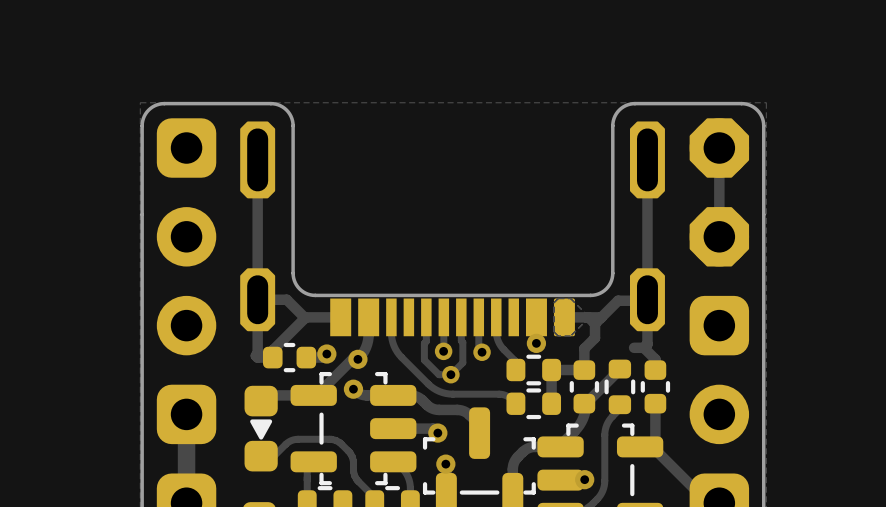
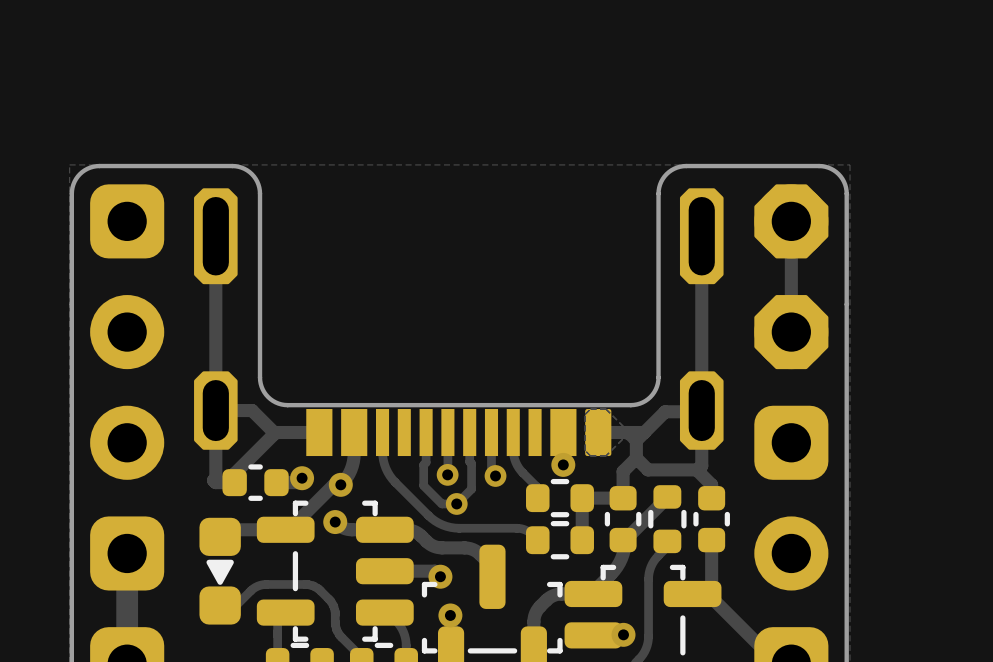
track: (634, 347) (643, 347) -> (636, 458) (648, 469) (696, 469)

